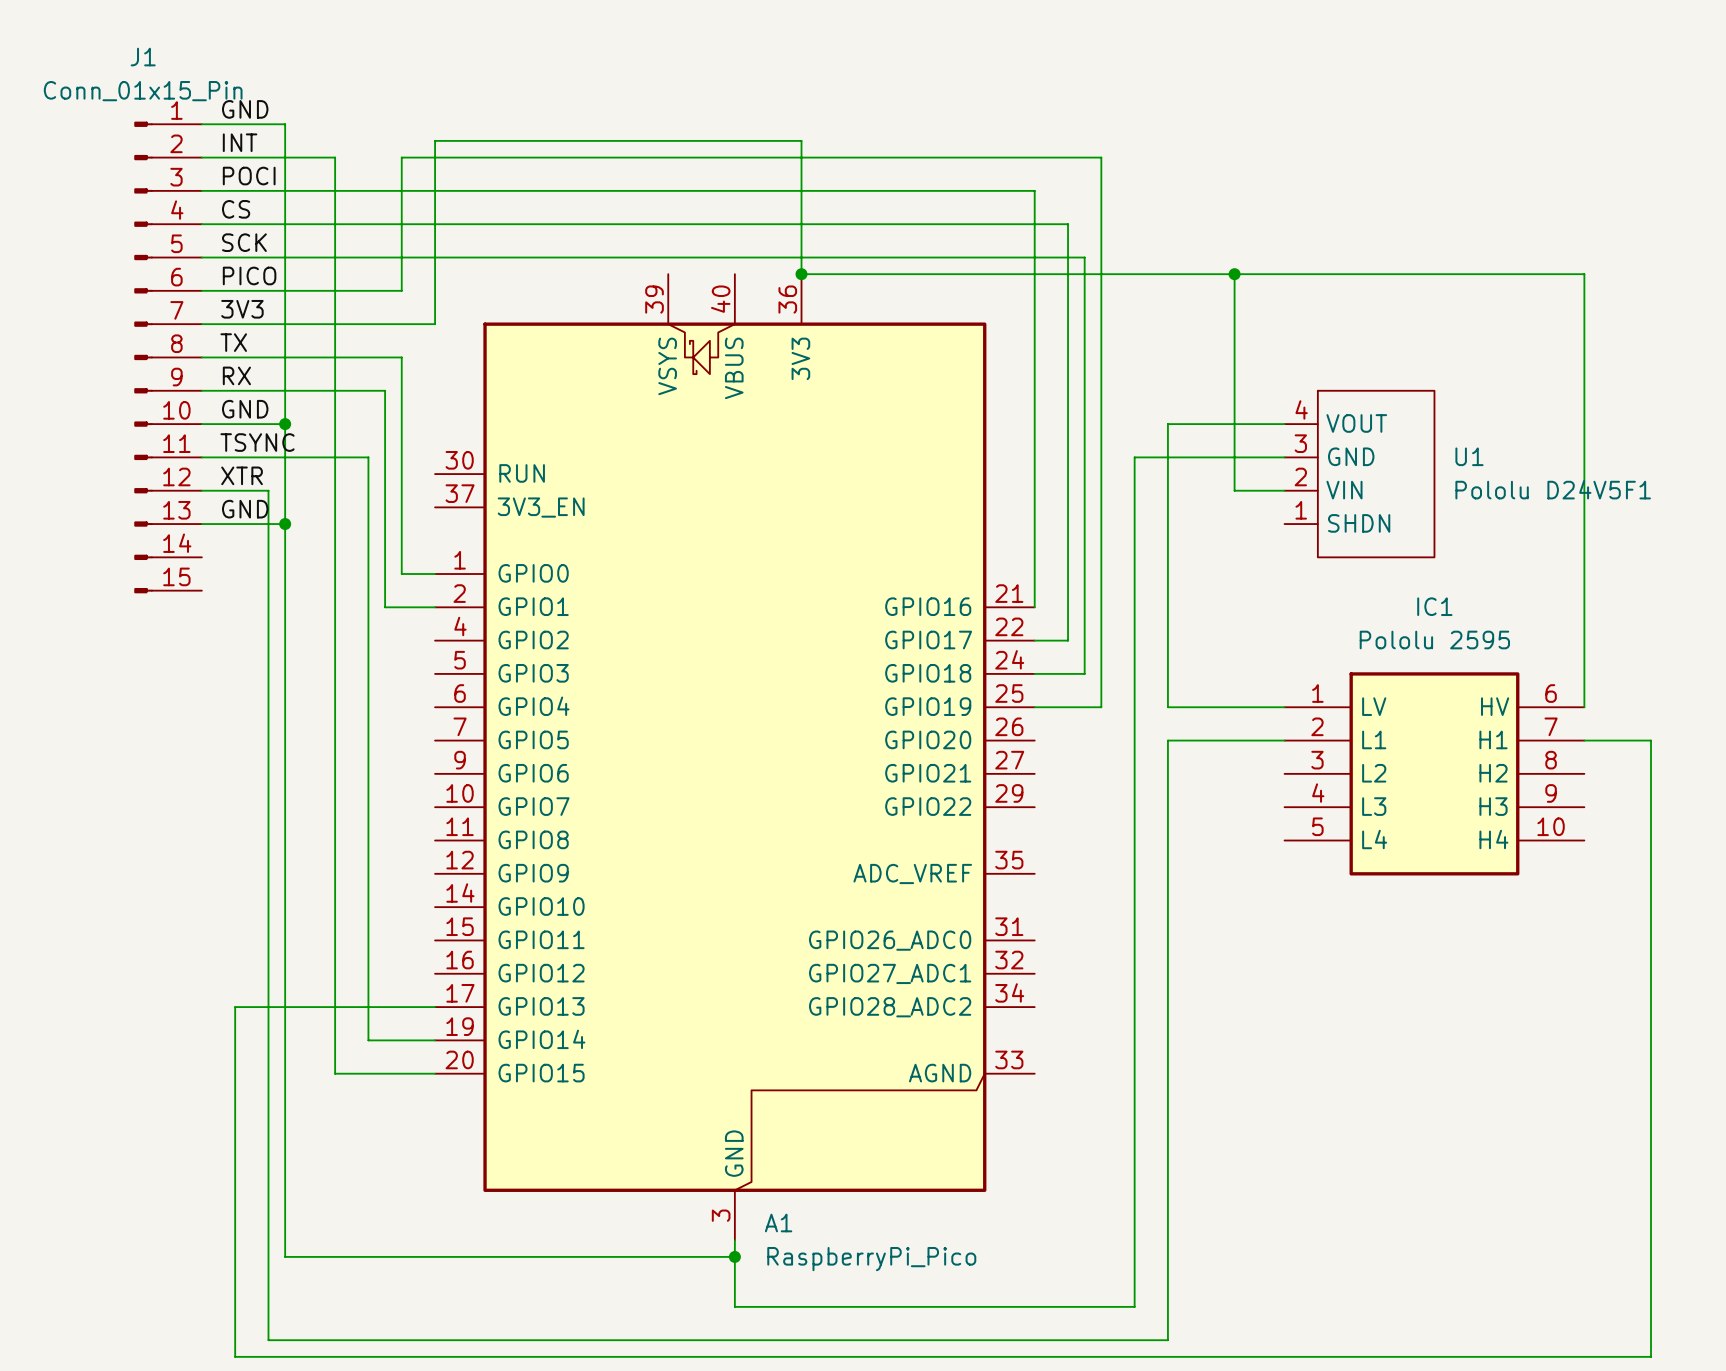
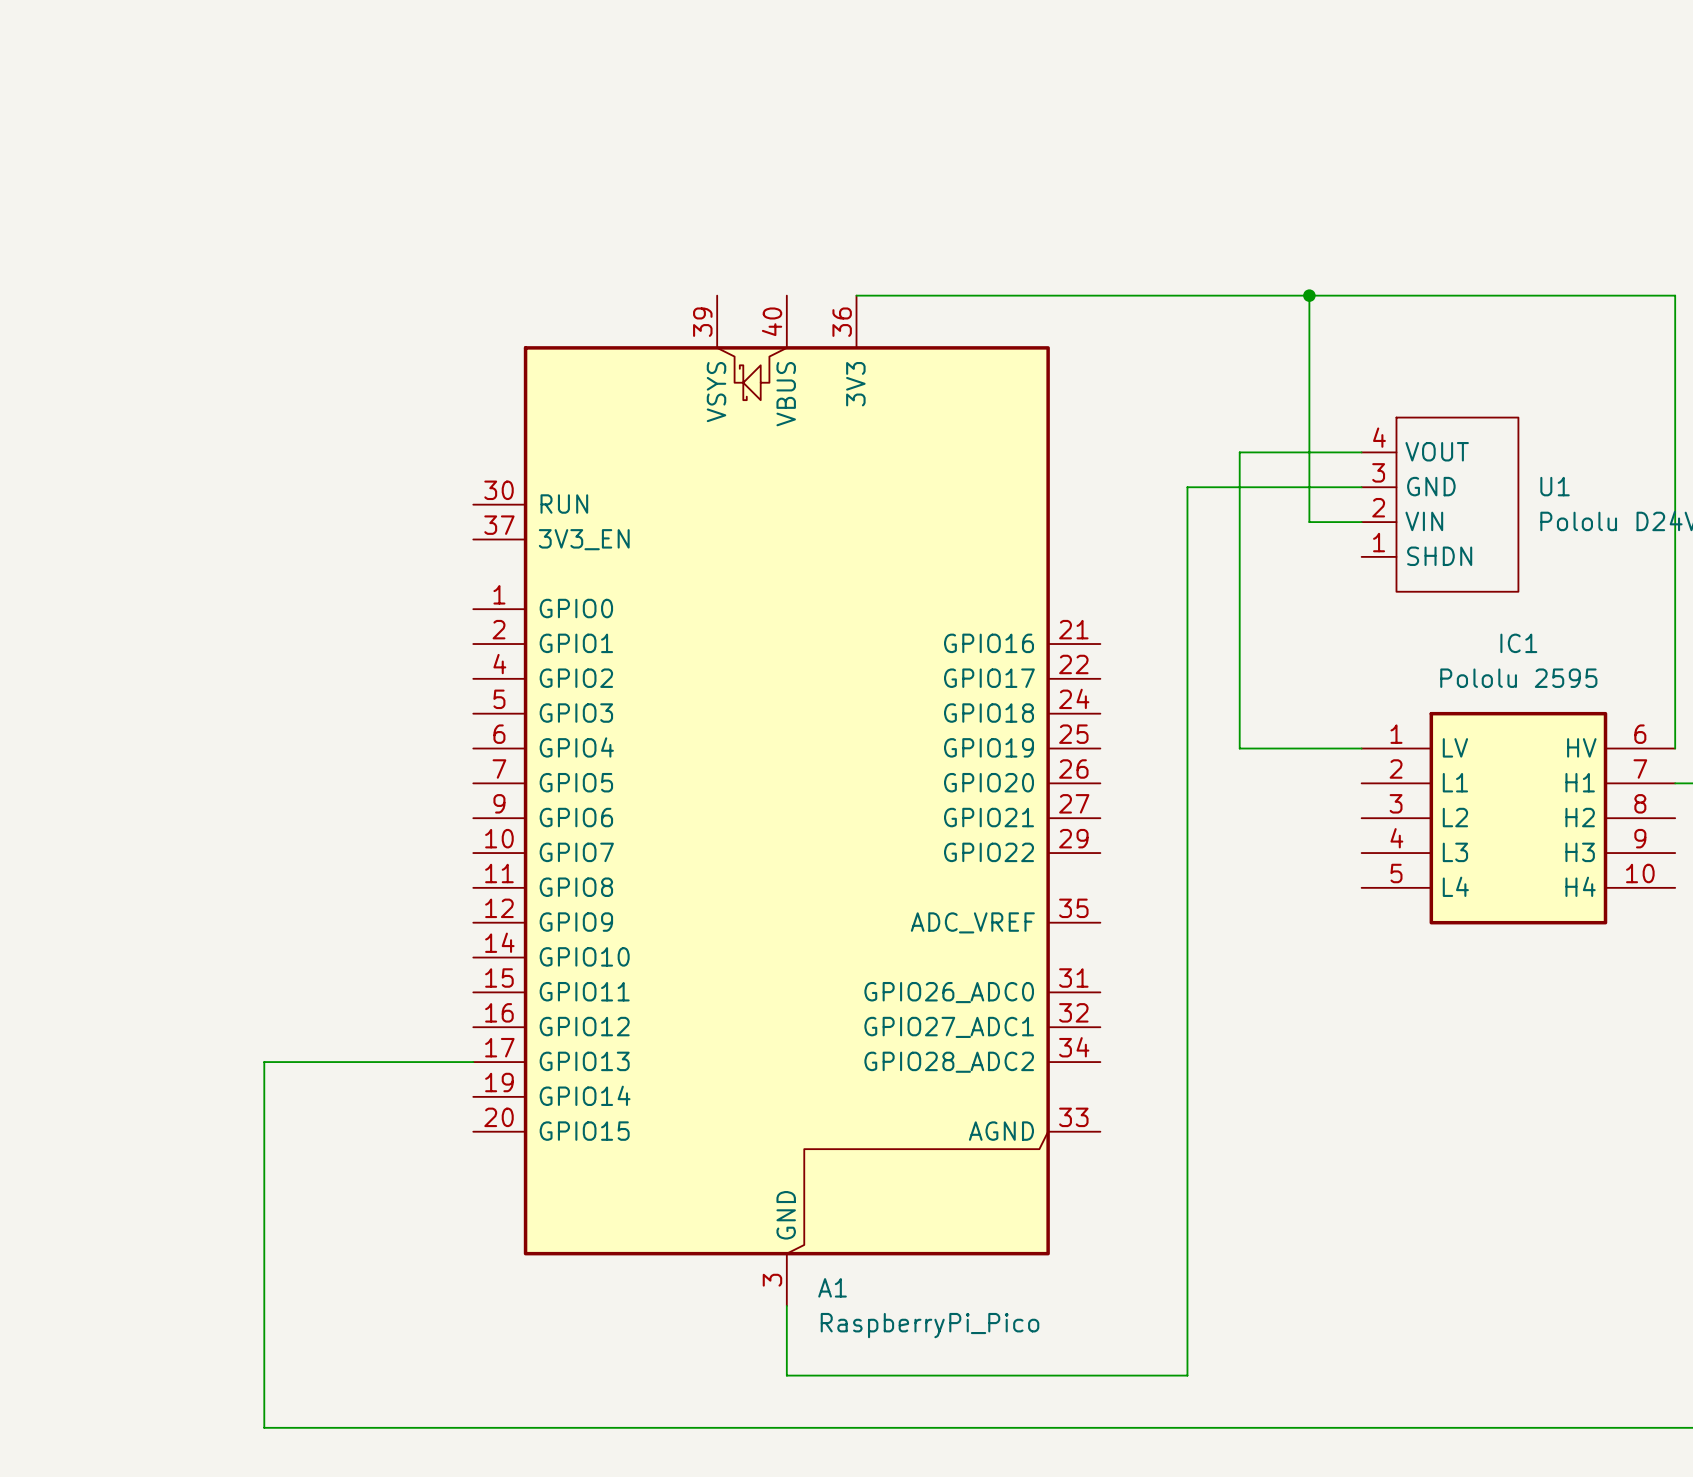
label: GND (245, 109) -> none
wire: (201, 124) (285, 124) (285, 1256) (734, 1256) -> none
label: INT (240, 142) -> none
wire: (201, 157) (335, 157) (335, 1073) (435, 1073) -> none
label: POCI (249, 176) -> none
wire: (201, 190) (1034, 190) (1034, 607) -> none
label: CS (236, 209) -> none
wire: (201, 224) (1068, 224) (1068, 640) (1034, 640) -> none
label: SCK (244, 242) -> none
wire: (201, 257) (1084, 257) (1084, 673) (1034, 673) -> none
wire: (801, 274) (801, 140) (435, 140) (435, 324) (201, 324) -> none
junction: (801, 274) -> none
label: PICO (249, 275) -> none
wire: (201, 290) (401, 290) (401, 157) (1101, 157) (1101, 707) (1034, 707) -> none
label: 3V3 (242, 309) -> none
label: TX (233, 342) -> none
J1: Conn_01x15_Pin (168, 357) -> none
wire: (201, 357) (401, 357) (401, 574) (435, 574) -> none
label: RX (236, 375) -> none
wire: (201, 390) (385, 390) (385, 607) (435, 607) -> none
label: GND (245, 409) -> none
wire: (201, 424) (285, 424) -> none
junction: (285, 424) -> none
label: TSYNC (257, 442) -> none
wire: (201, 457) (368, 457) (368, 1040) (435, 1040) -> none
wire: (1134, 457) (1134, 1306) (1117, 1306) -> (1204, 487) (1187, 487) (1187, 1375)
label: XTR (242, 475) -> none
wire: (201, 490) (268, 490) (268, 1340) (1167, 1340) (1167, 740) (1284, 740) -> none
label: GND (245, 509) -> none
wire: (201, 524) (285, 524) -> none
junction: (285, 524) -> none
junction: (734, 1256) -> none

